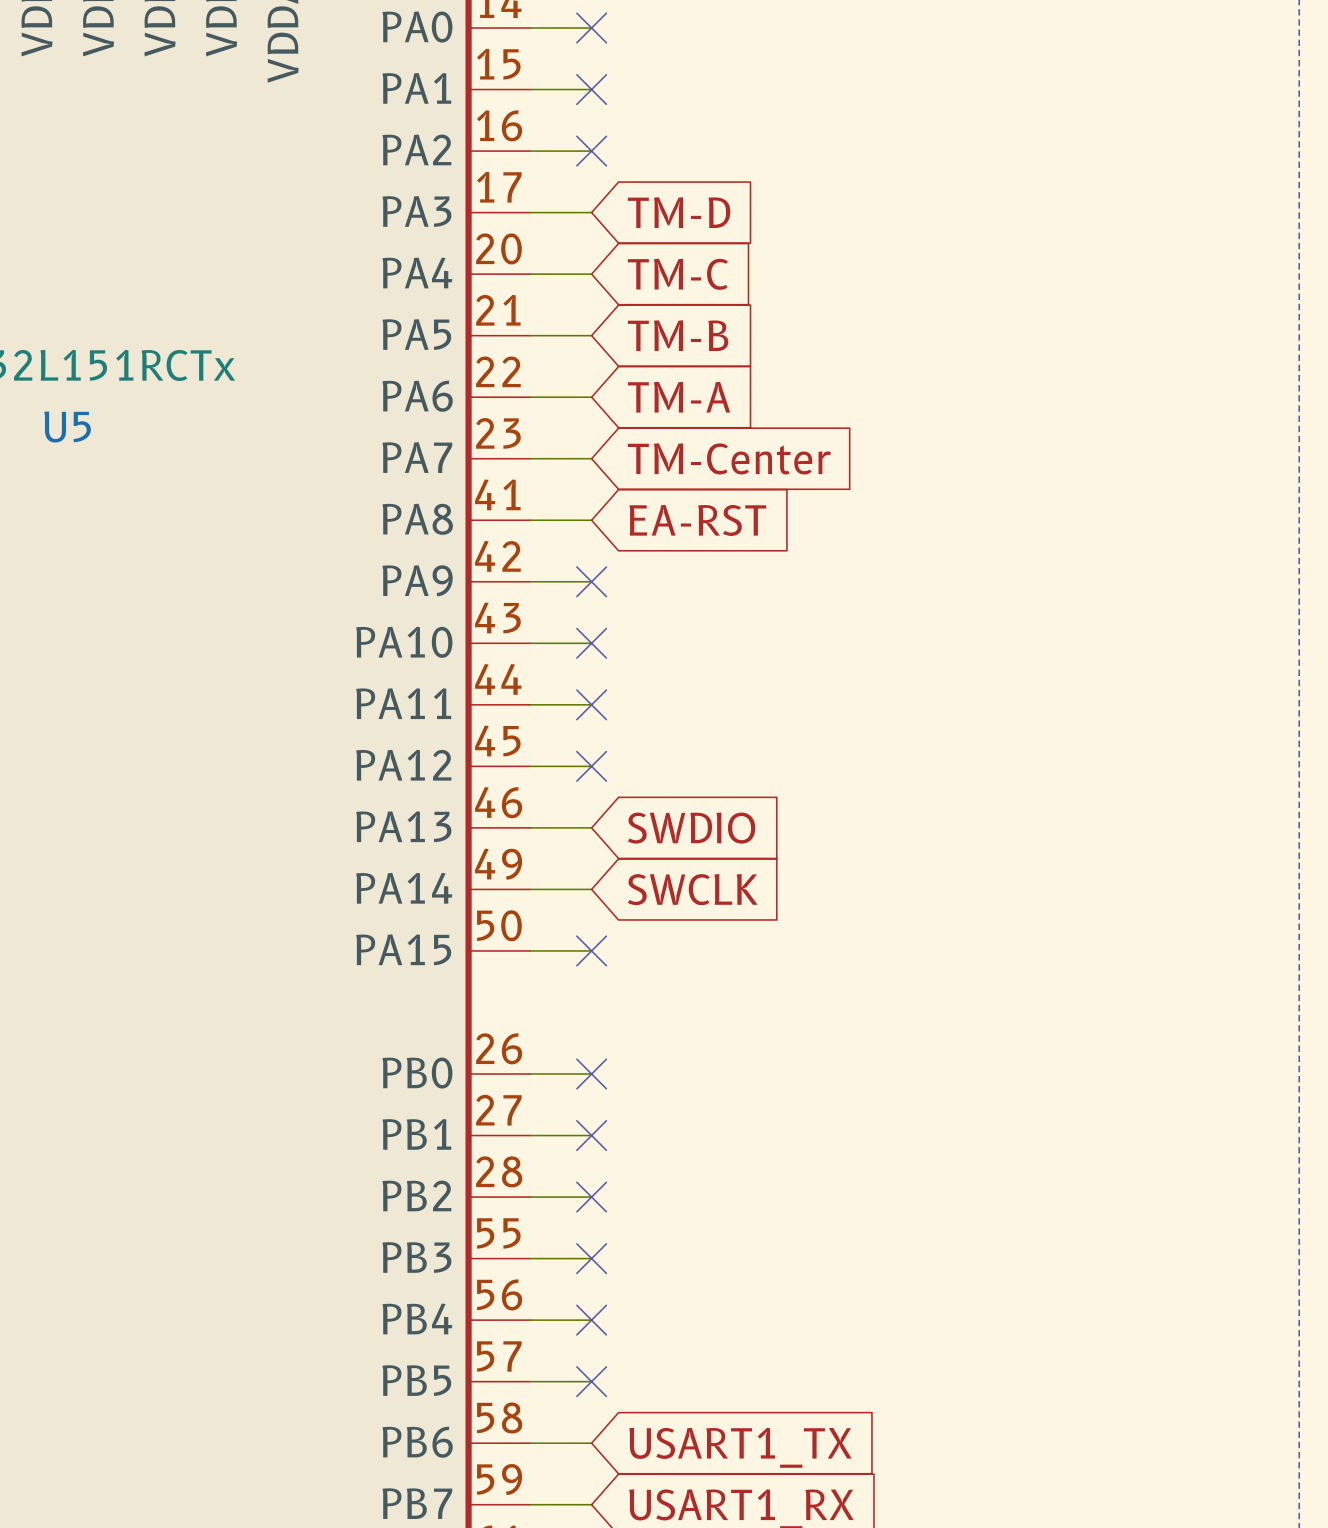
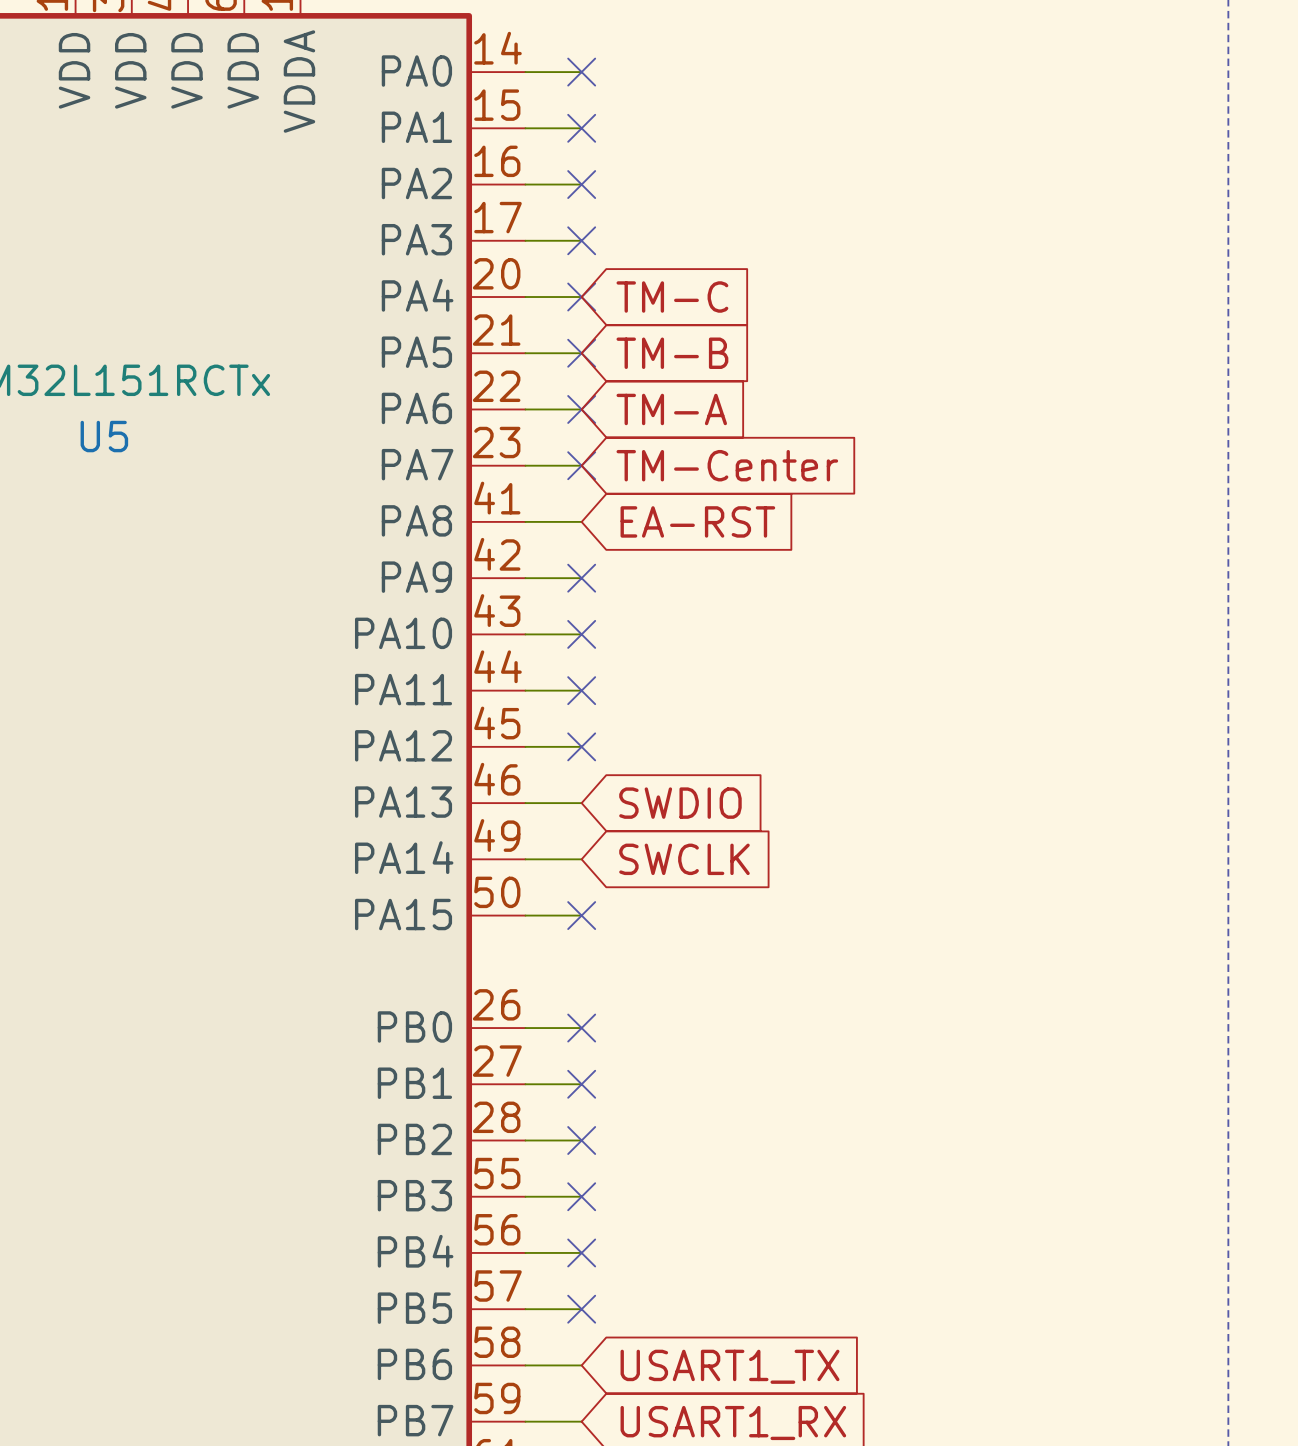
no-connect mark: none -> (581, 240)
global label: TM-D (679, 212) -> none
no-connect mark: none -> (581, 297)
no-connect mark: none -> (581, 353)
no-connect mark: none -> (581, 409)
no-connect mark: none -> (581, 465)

